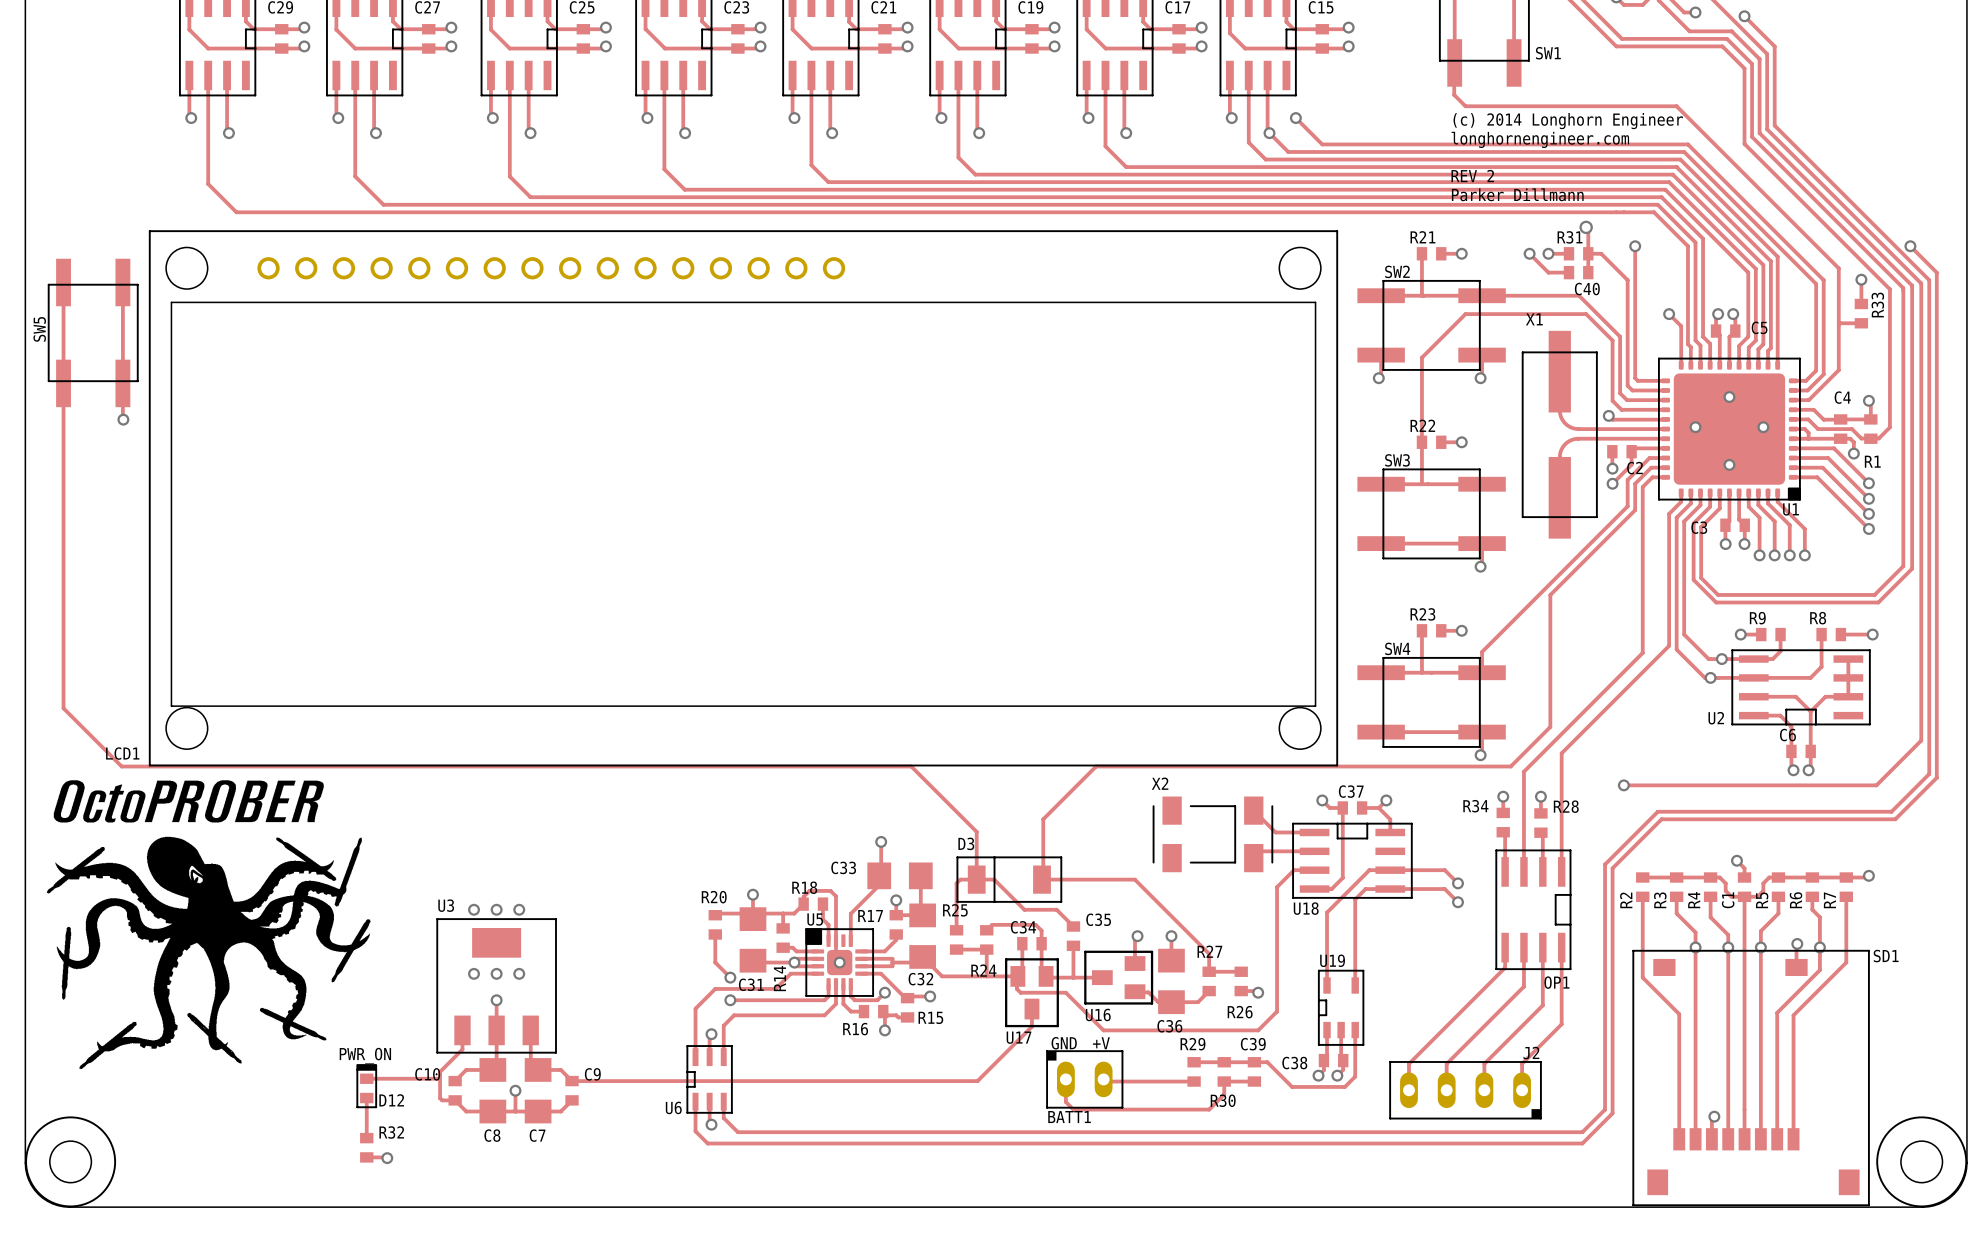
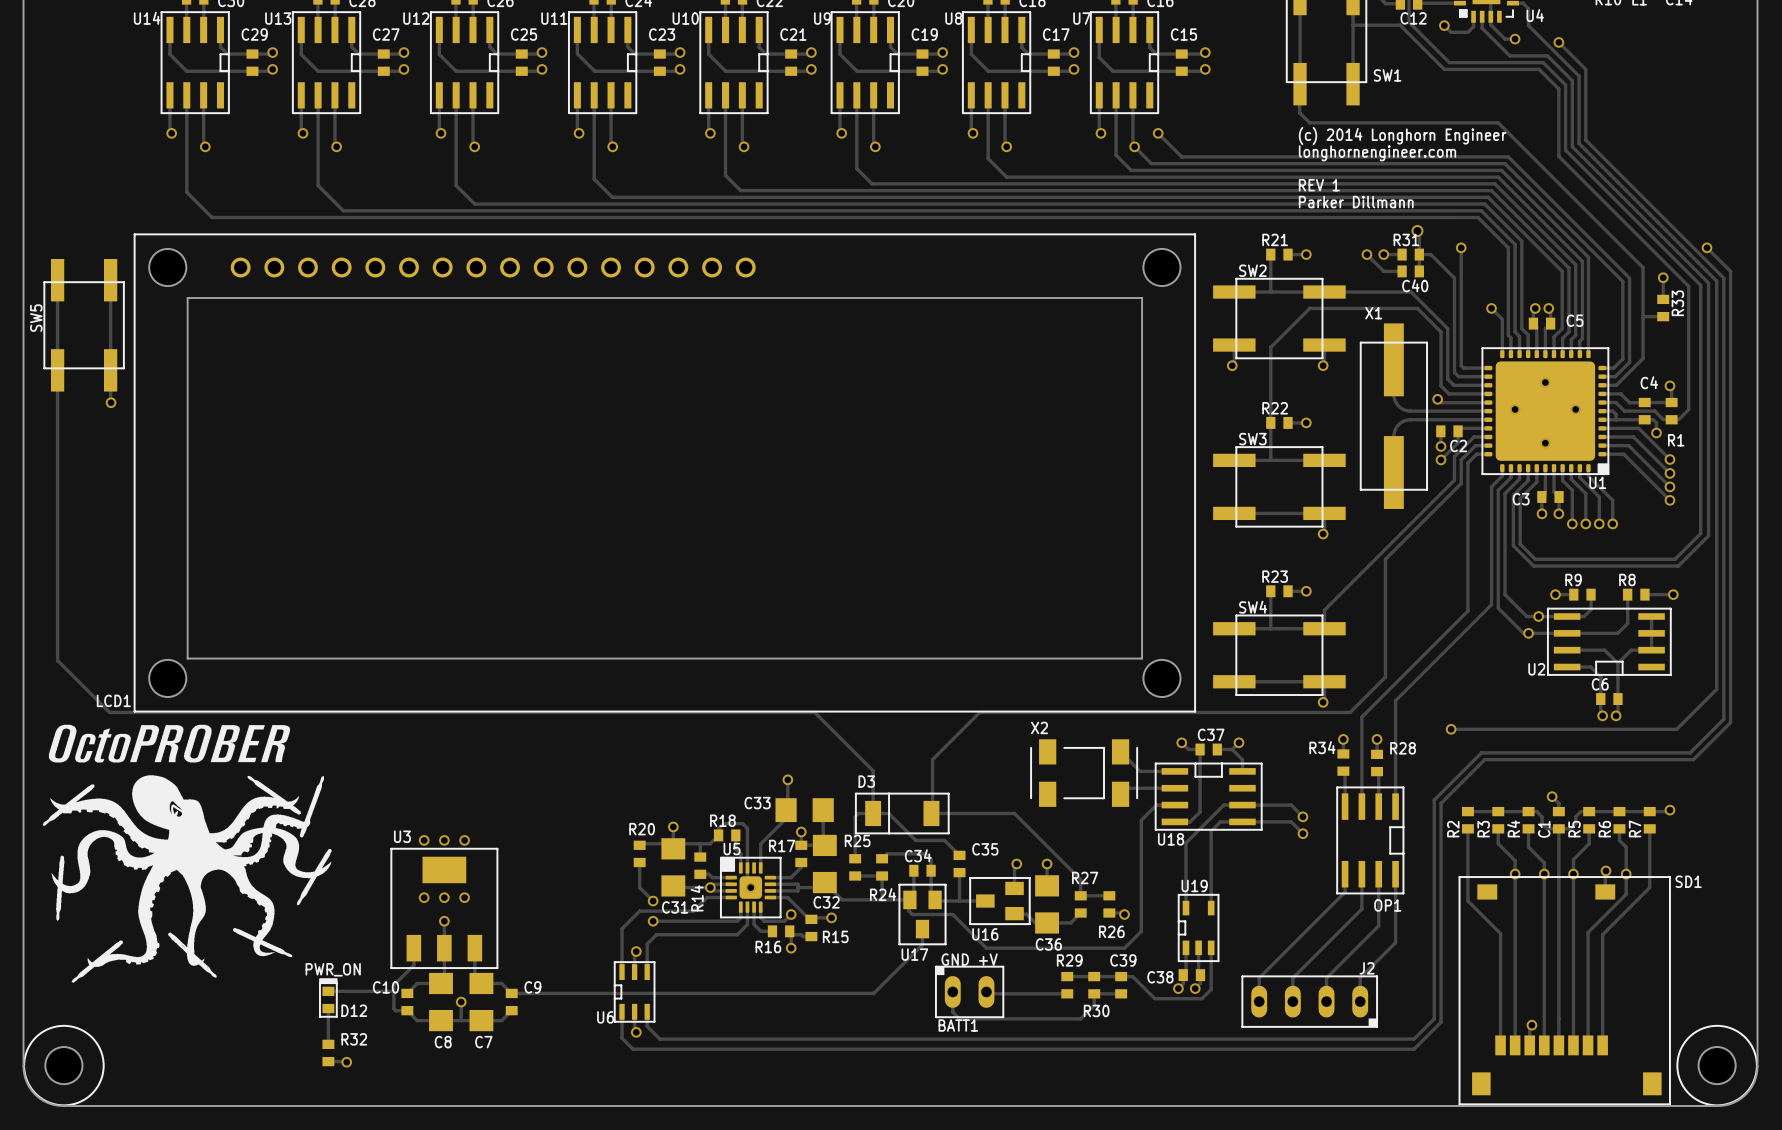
drawing shape: [1451, 113, 1684, 202] -> [1298, 126, 1507, 209]
LCD1 footprint: [148, 230, 1339, 767] -> [133, 233, 1196, 713]

